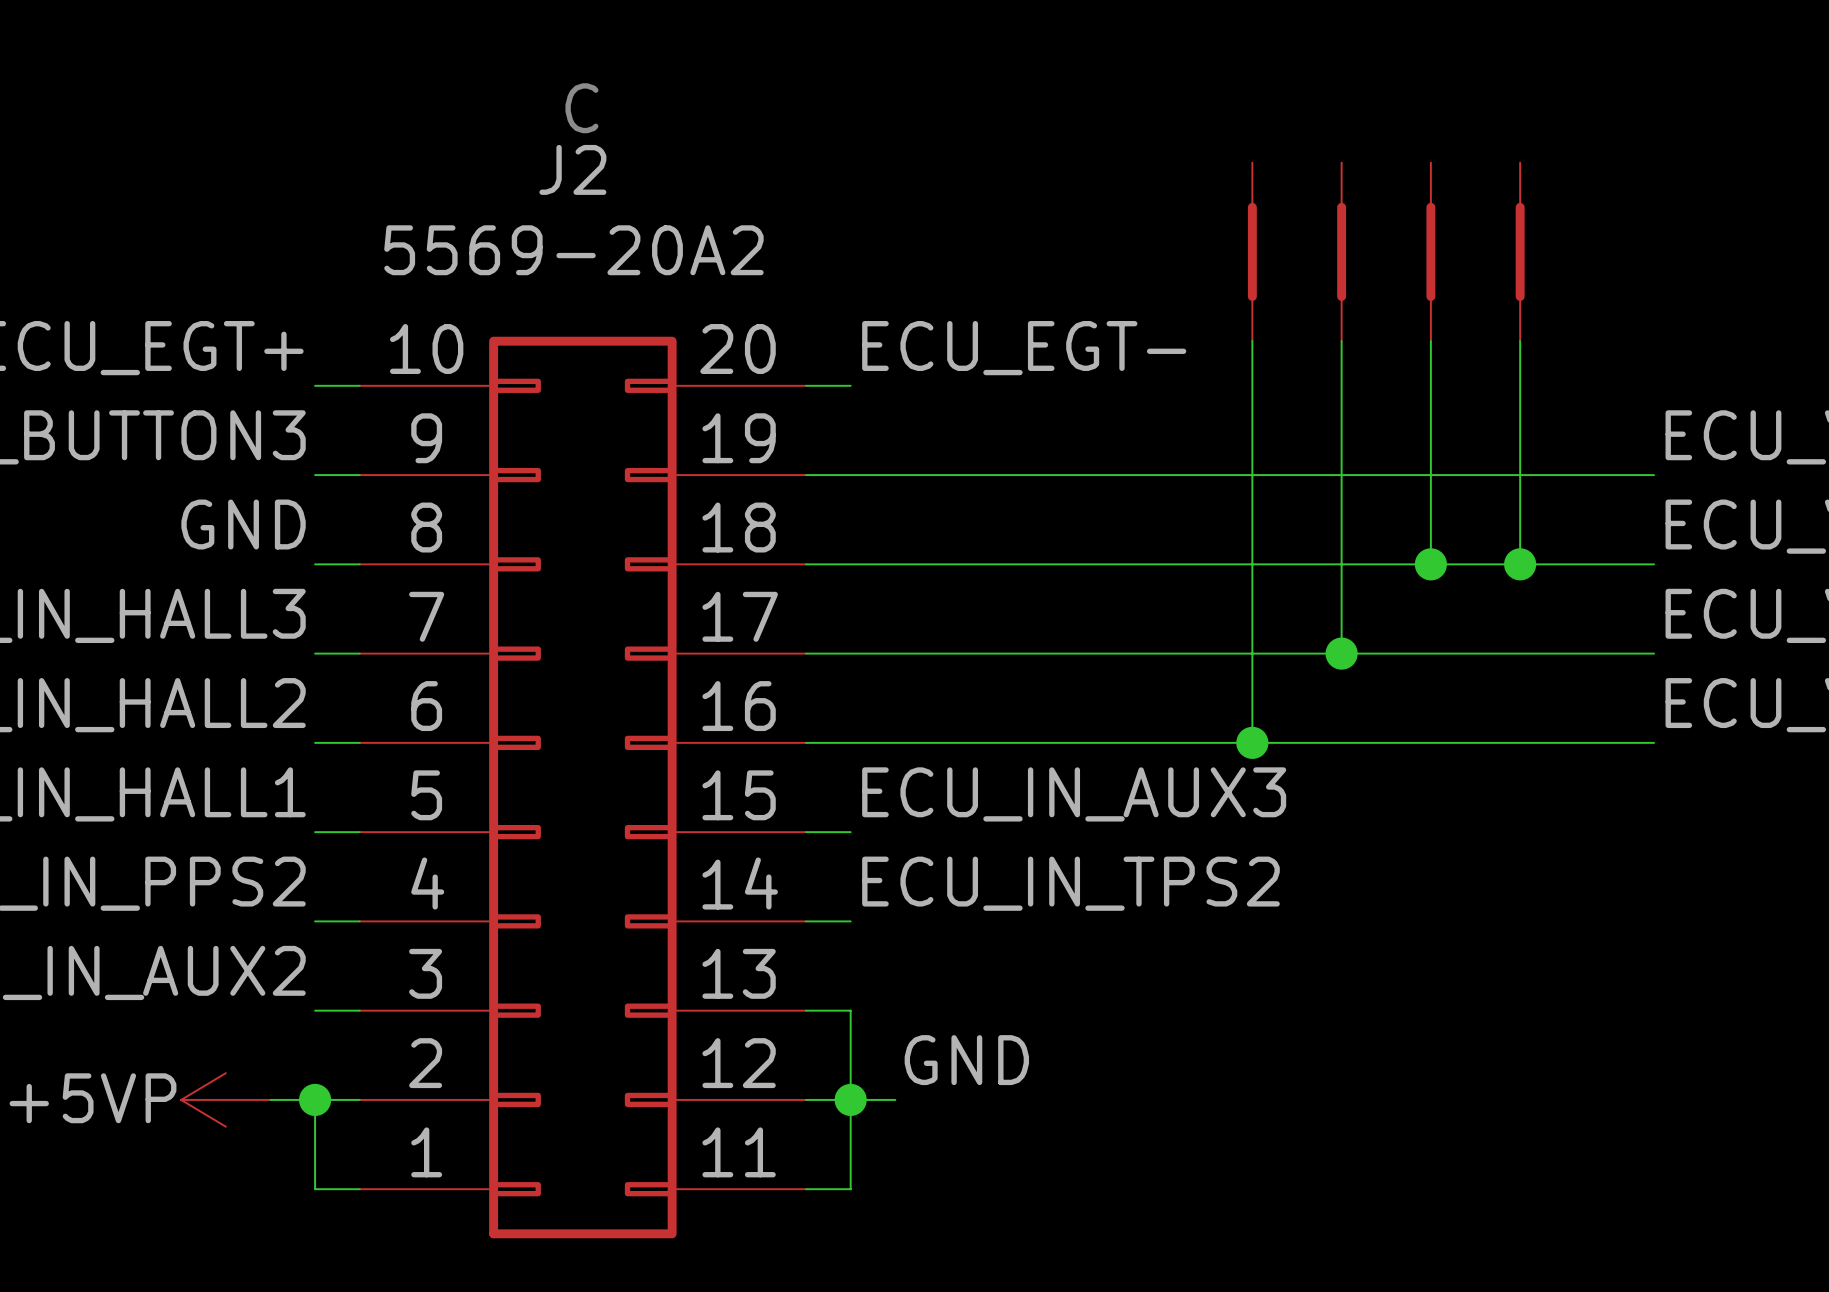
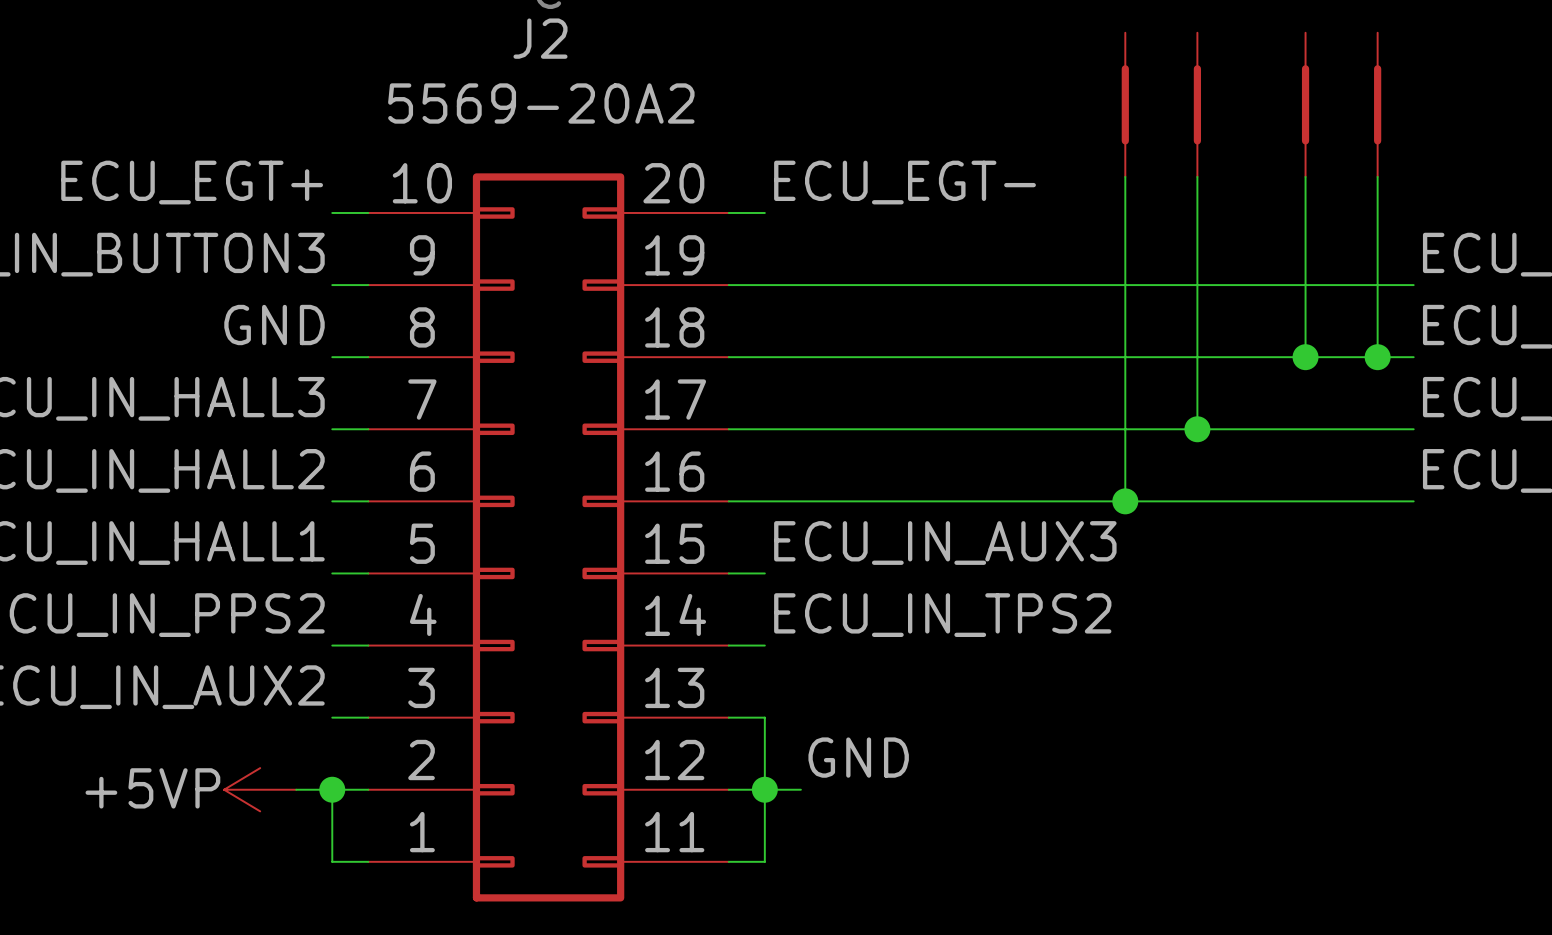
part: (1252, 251) -> none
part: none -> (1125, 104)
part: (1341, 251) -> none
part: none -> (1197, 104)
part: (1430, 251) -> none
part: none -> (1377, 104)
wire: (1252, 341) (1252, 742) -> (1125, 176) (1125, 501)
wire: (1341, 341) (1341, 653) -> (1197, 176) (1197, 429)
wire: (1430, 341) (1430, 564) -> (1377, 176) (1377, 357)
junction: (1430, 564) -> none
junction: none -> (1377, 357)
junction position: (1341, 653) -> (1197, 429)
junction position: (1252, 742) -> (1125, 501)

